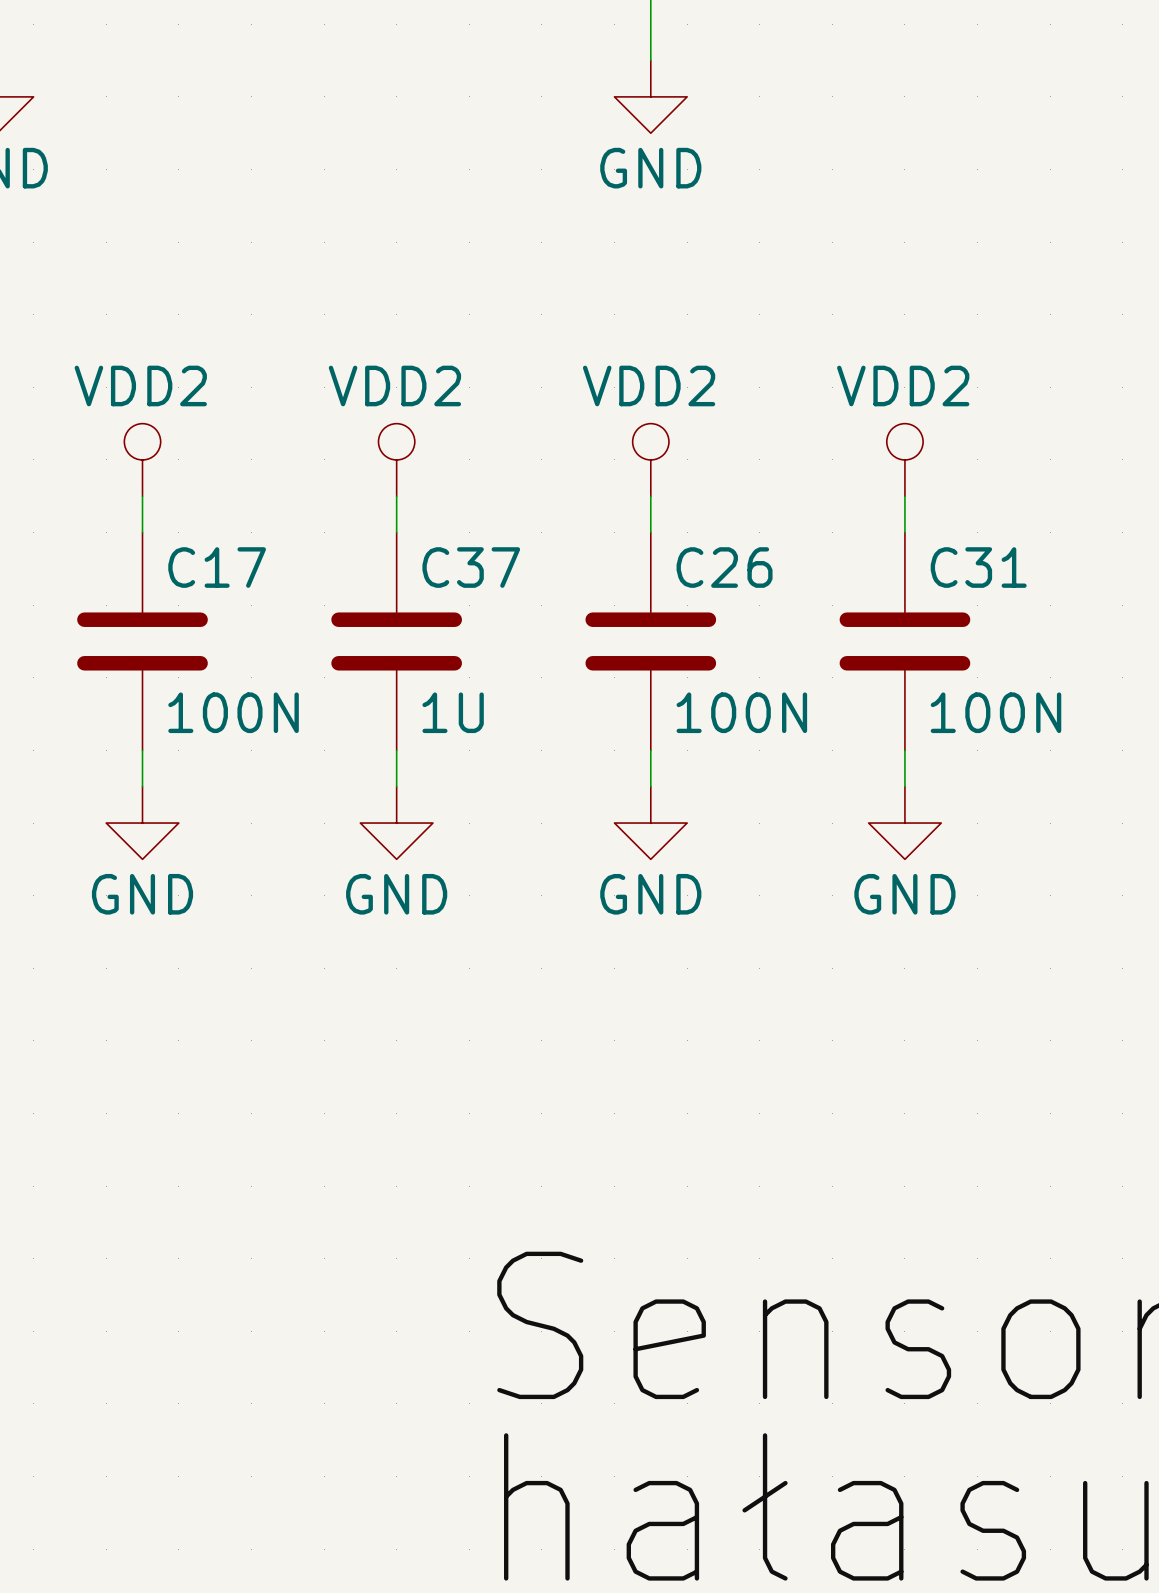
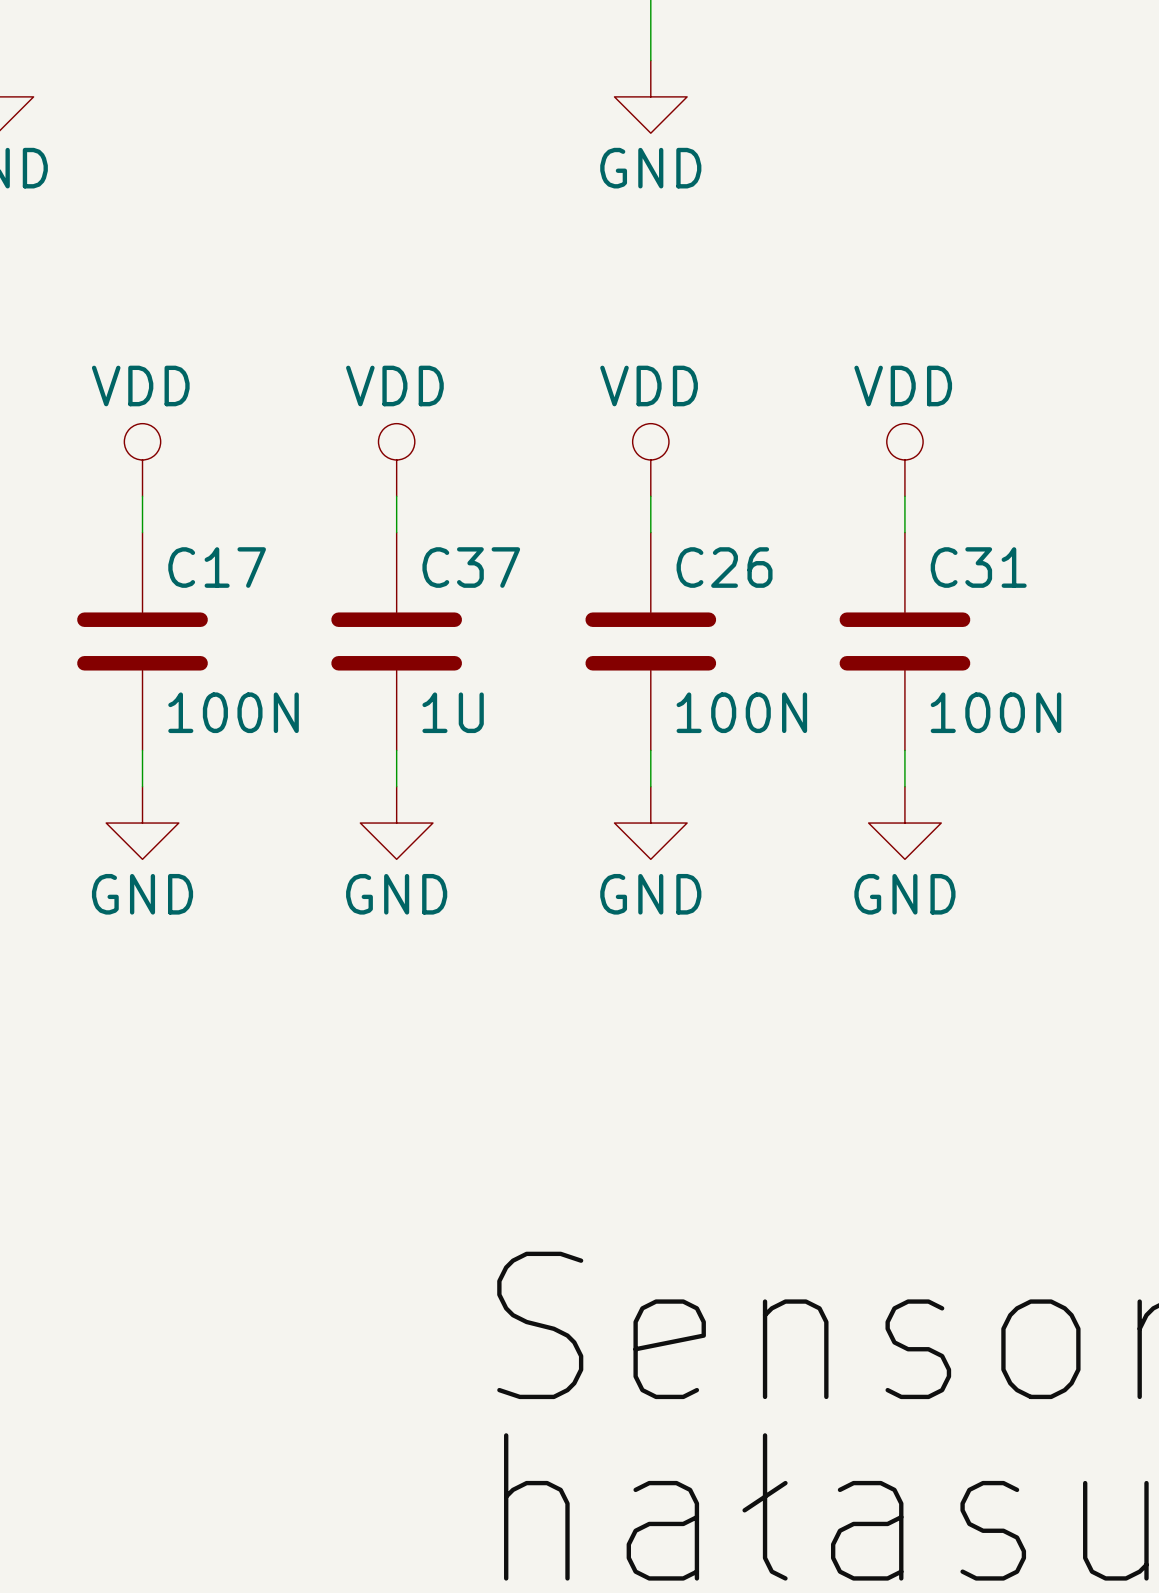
power symbol: VDD2 (142, 459) -> VDD (142, 459)
power symbol: VDD2 (396, 459) -> VDD (396, 459)
power symbol: VDD2 (650, 459) -> VDD (650, 459)
power symbol: VDD2 (904, 459) -> VDD (904, 459)

